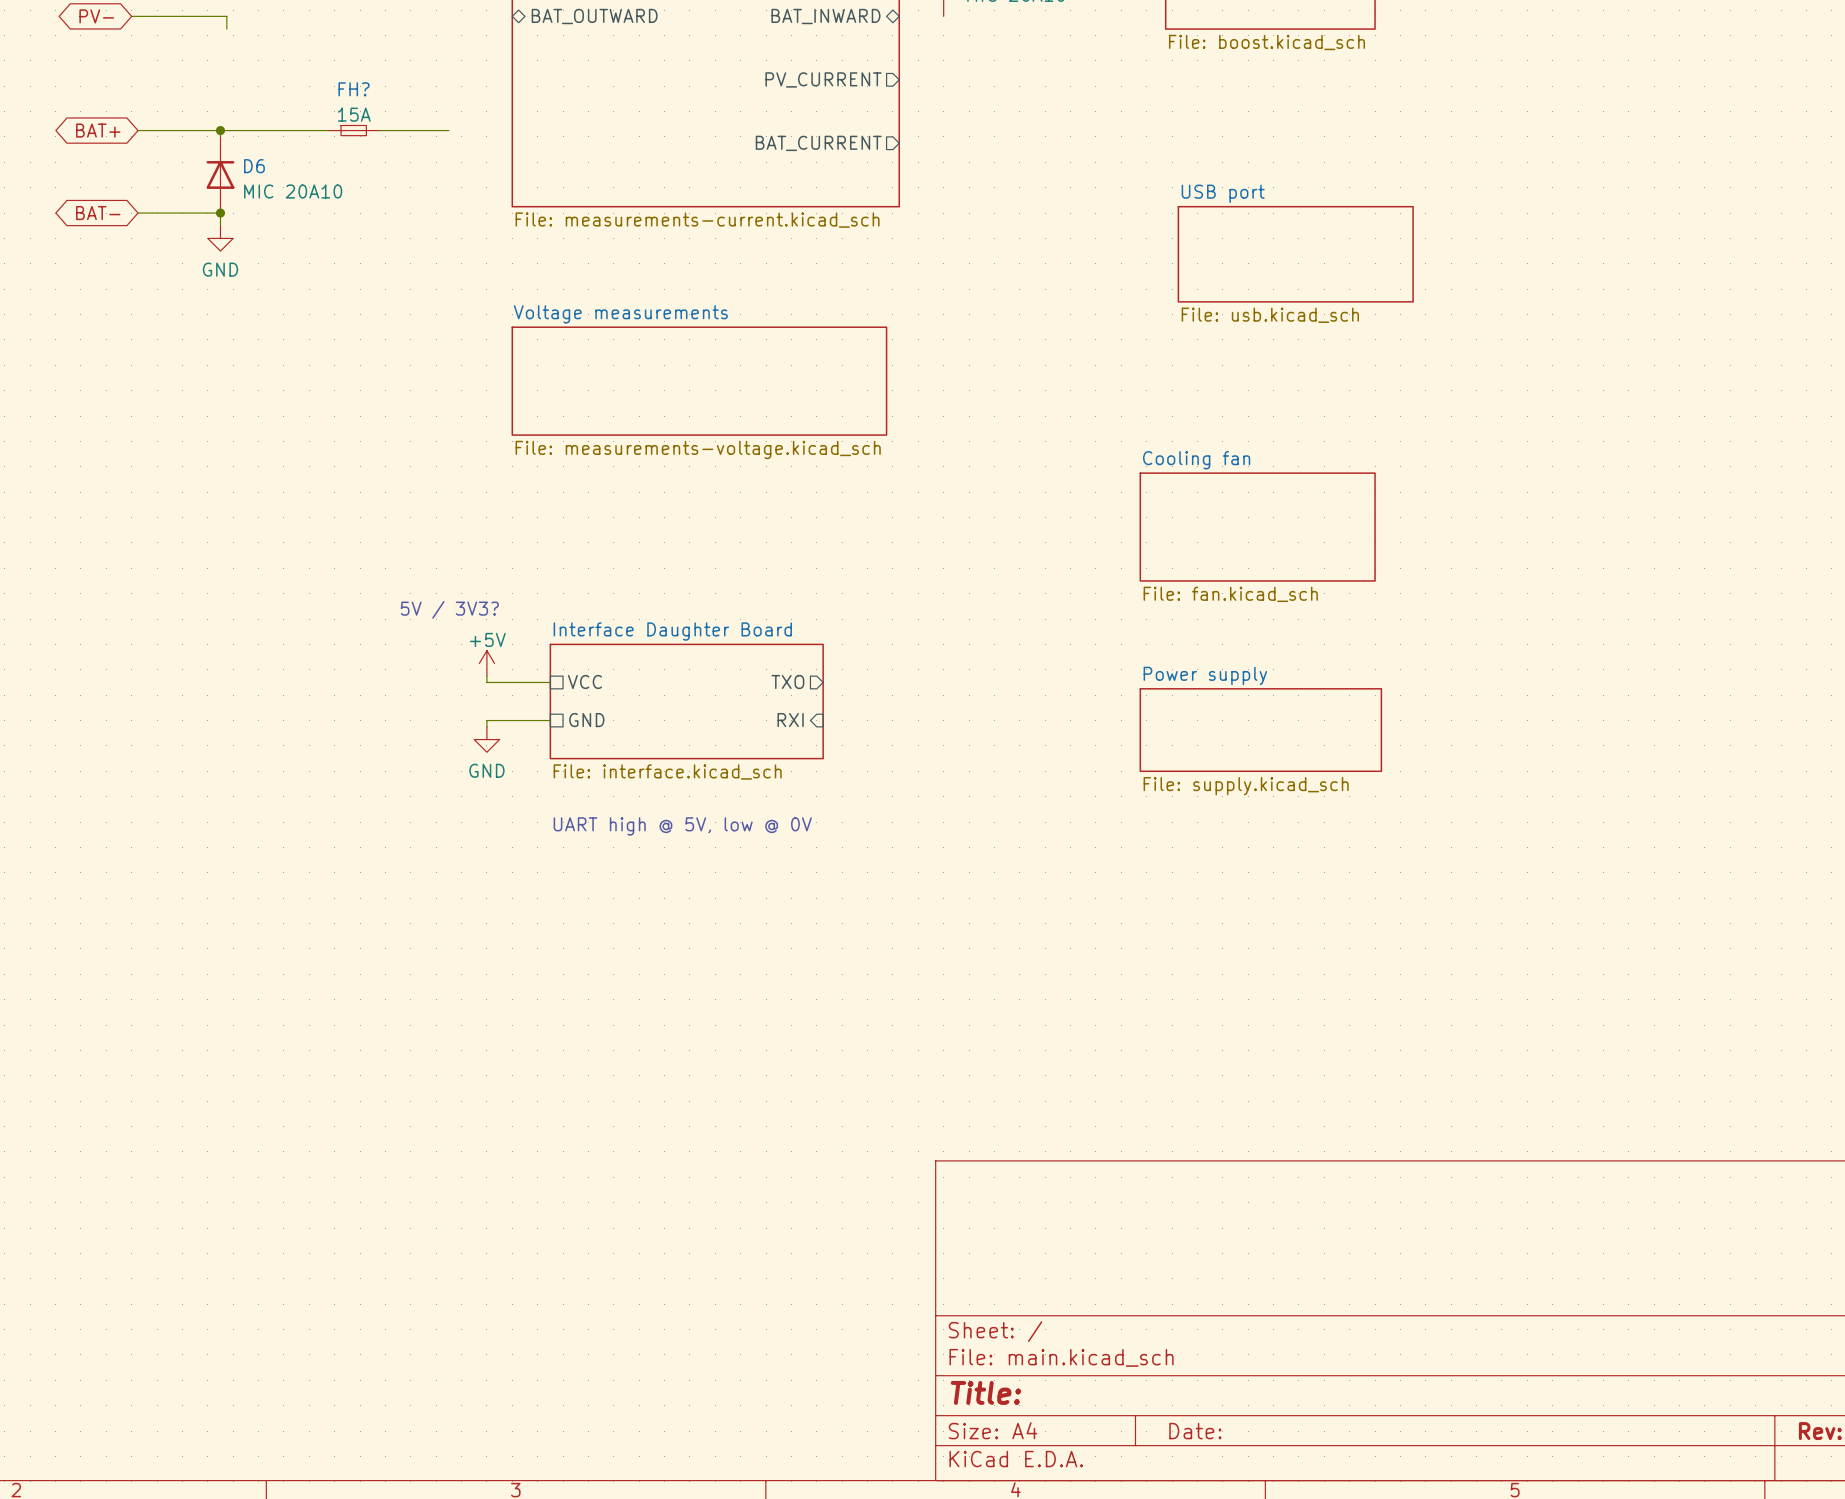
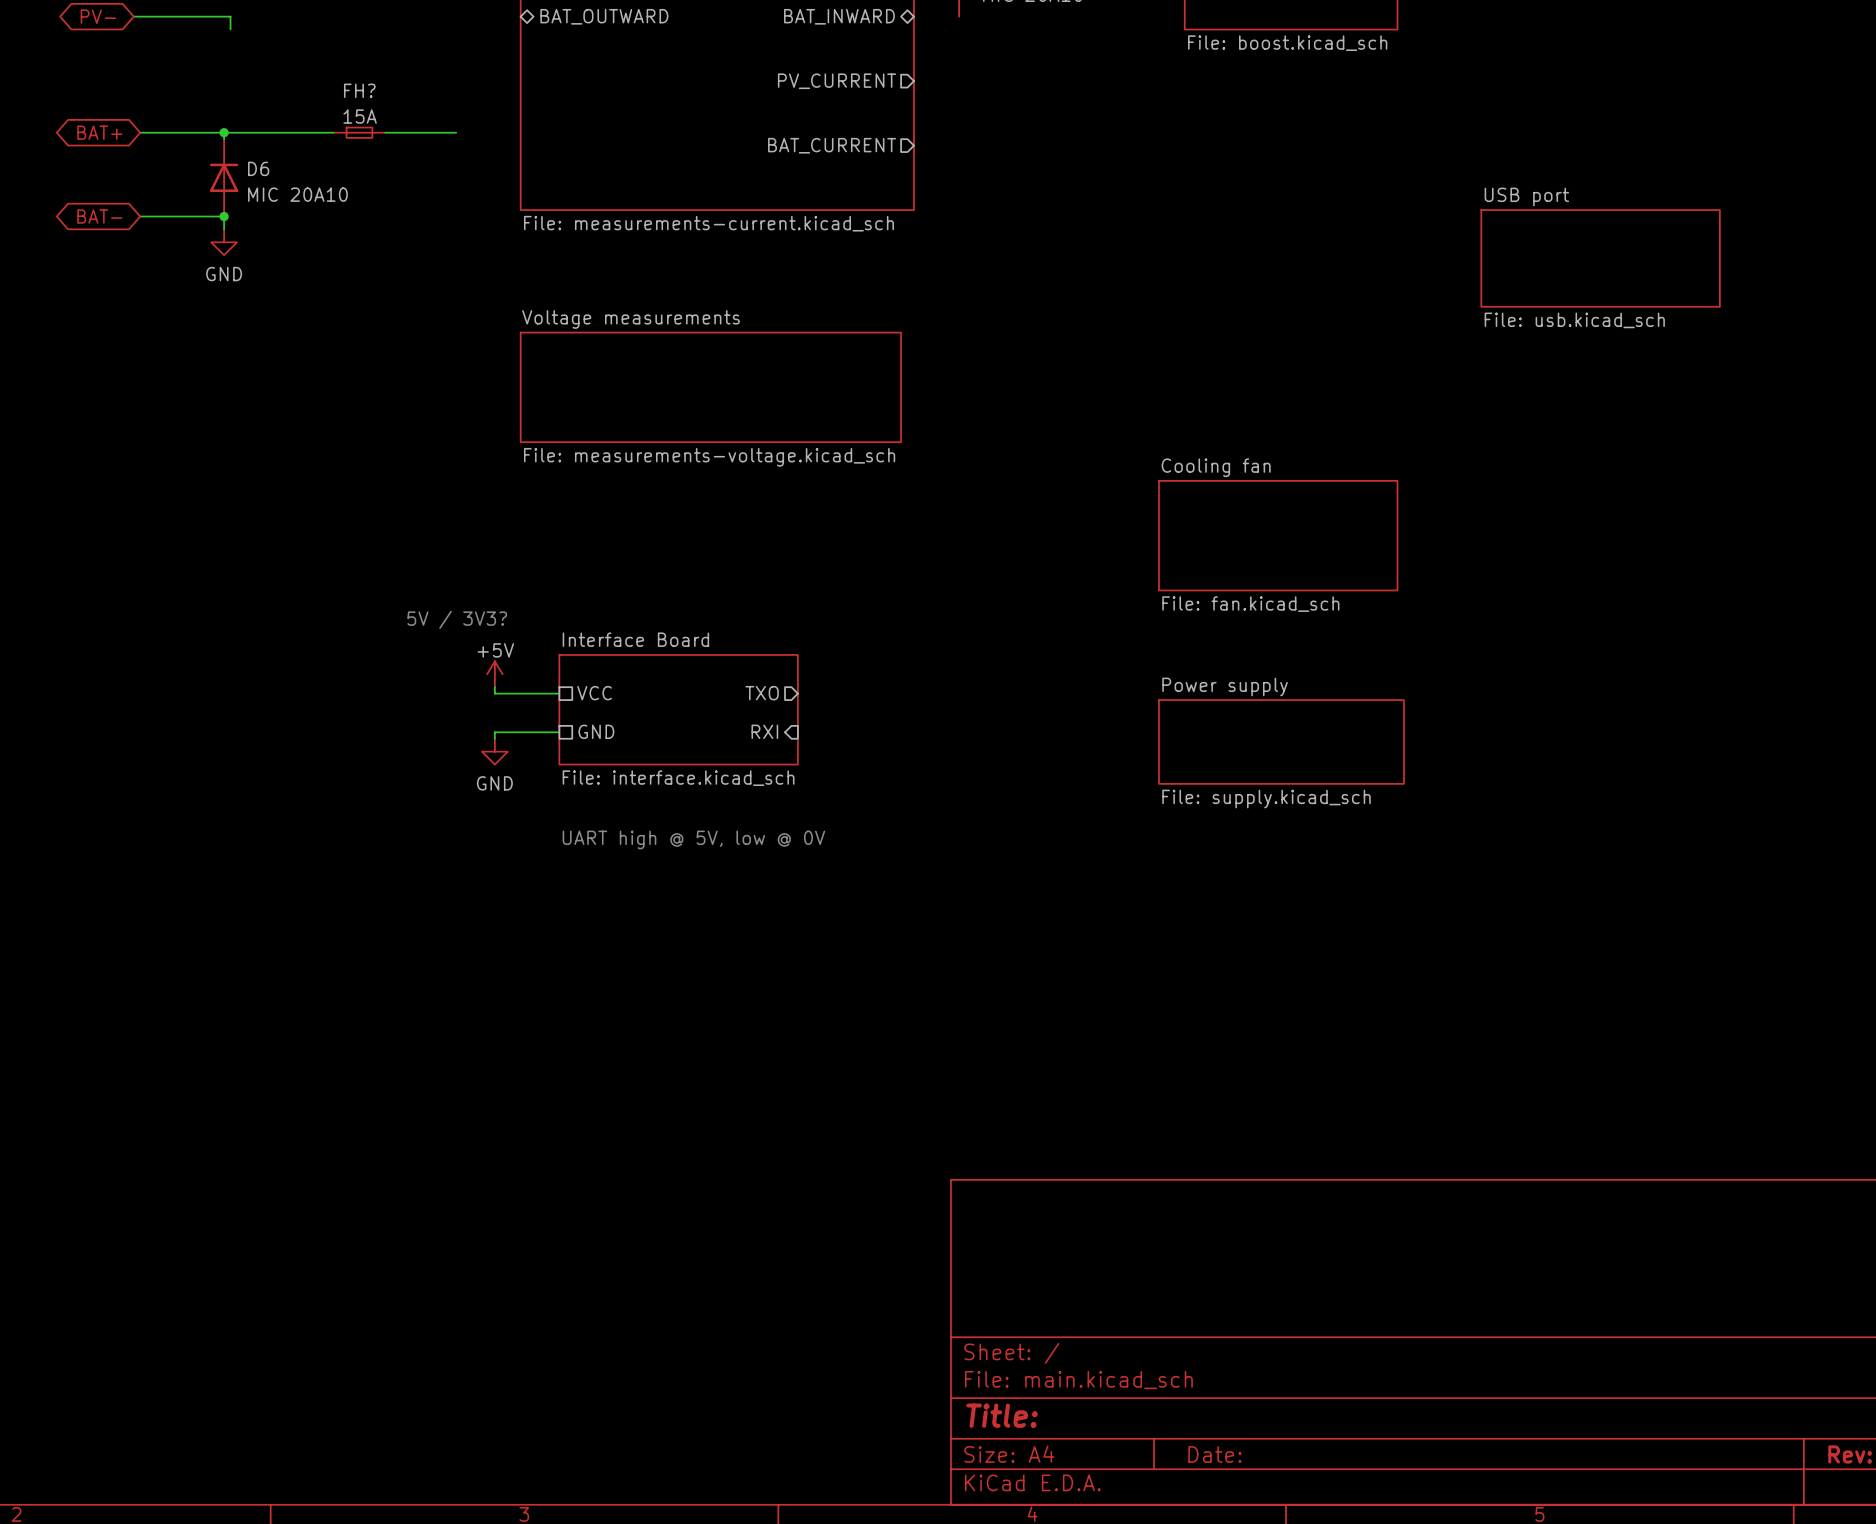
sheet USB port: File: usb.kicad_sch (1295, 254) -> none
sheet USB port: none -> File: usb.kicad_sch (1600, 258)
sheet pin position: TXO (787, 682) -> TXO (762, 693)
sheet Interface Board: none -> File: interface.kicad_sch (678, 709)
sheet Interface Daughter Board: File: interface.kicad_sch (686, 701) -> none
sheet pin position: RXI (790, 720) -> RXI (764, 731)

